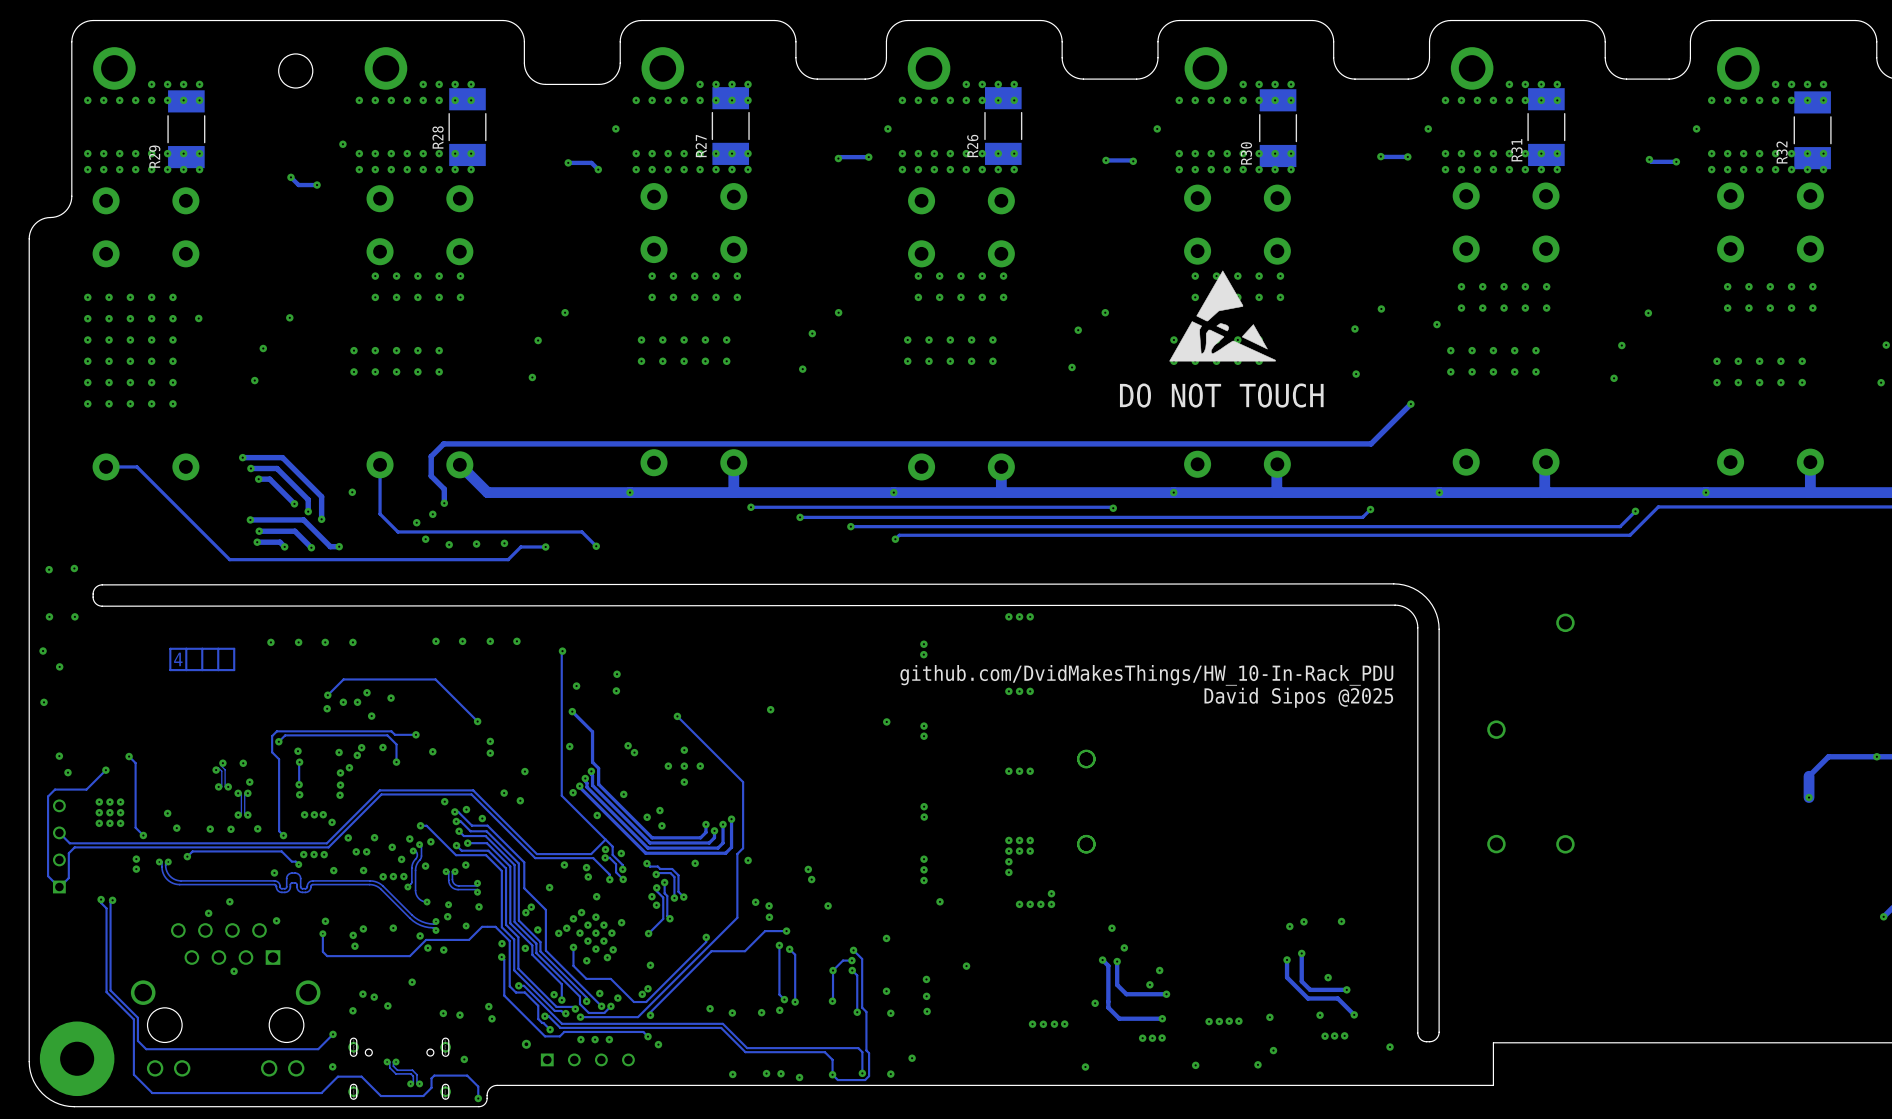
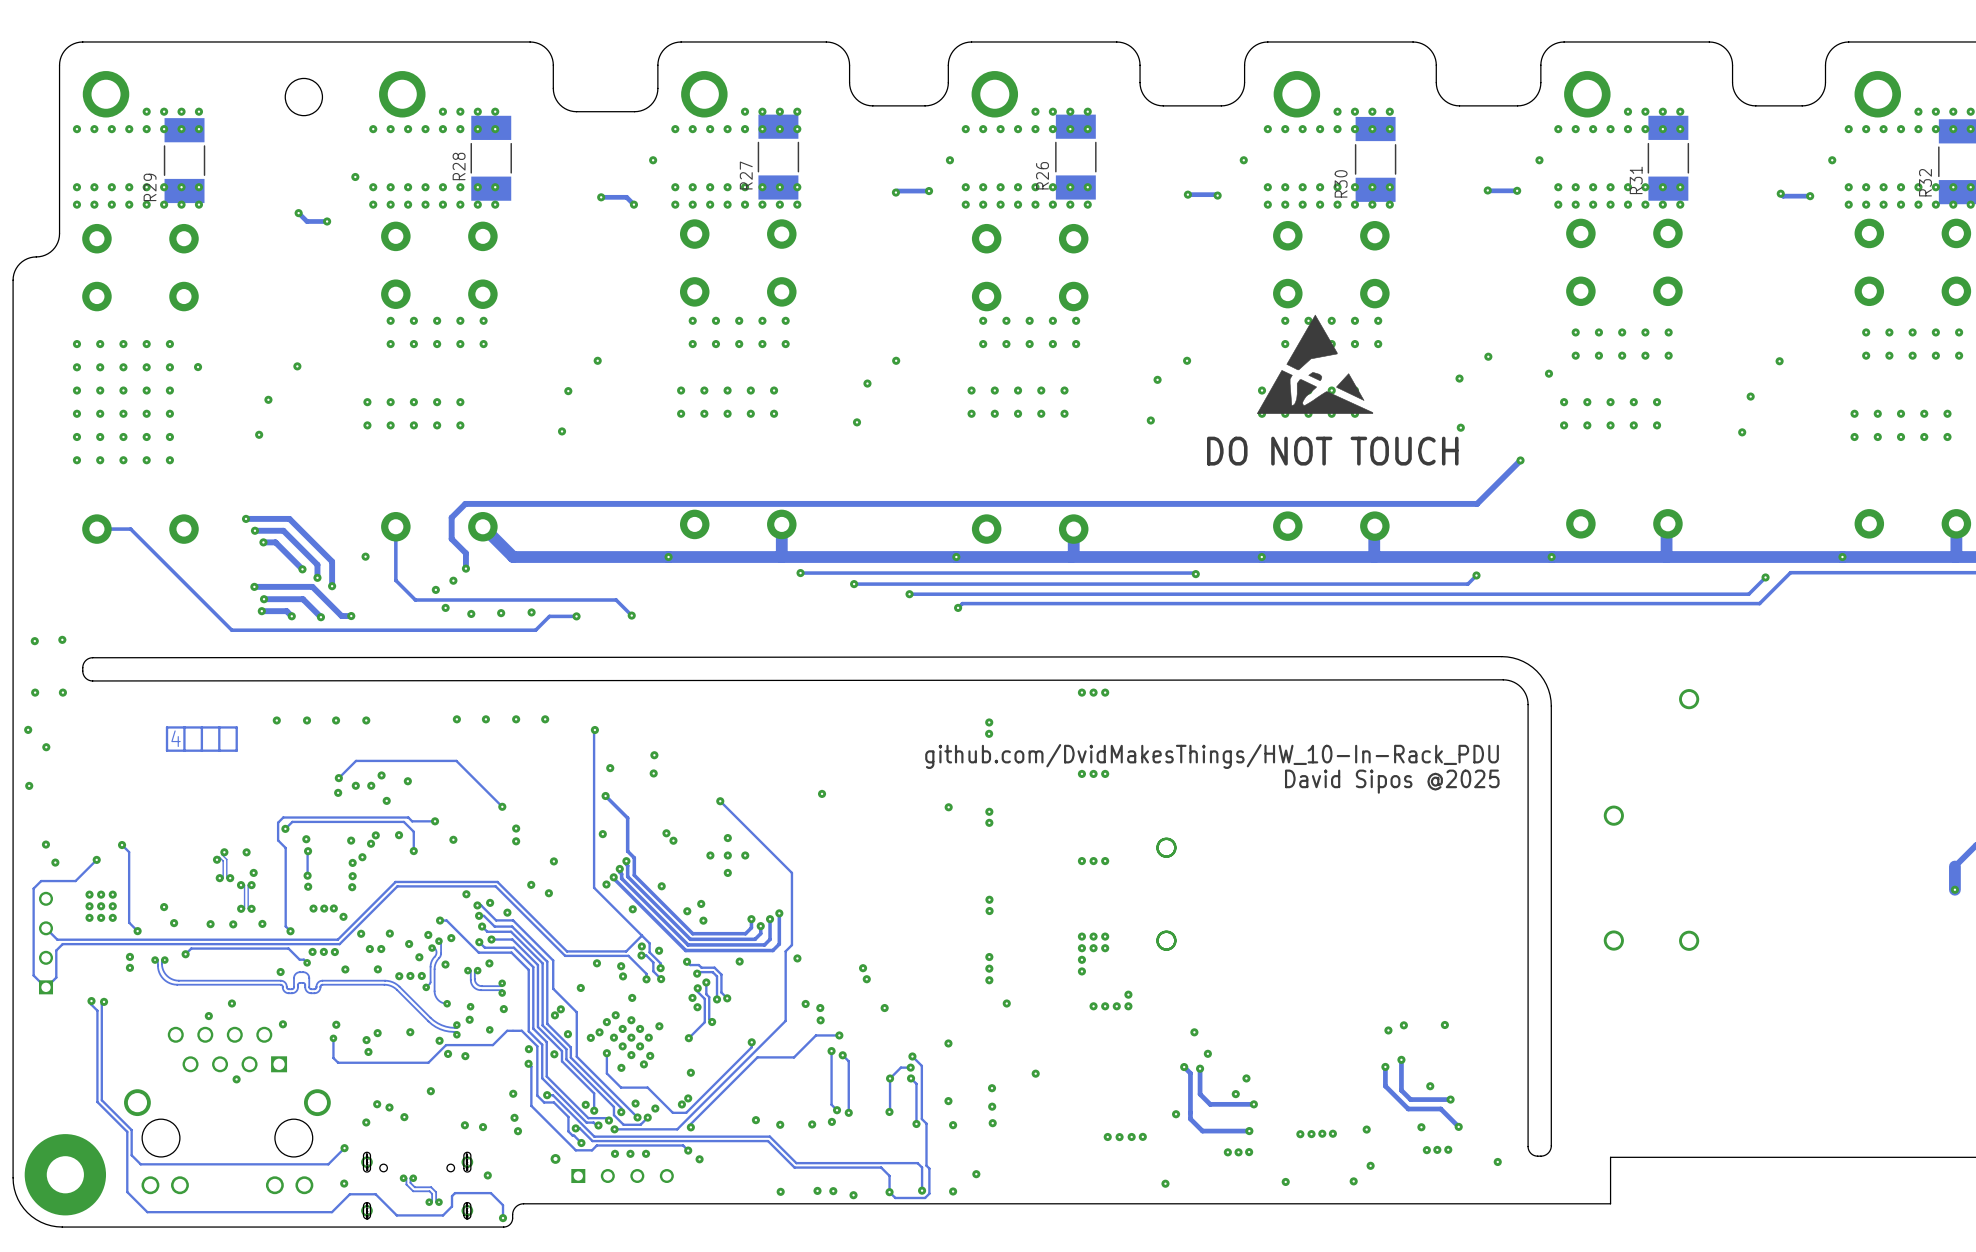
via: none -> (513, 1093)

